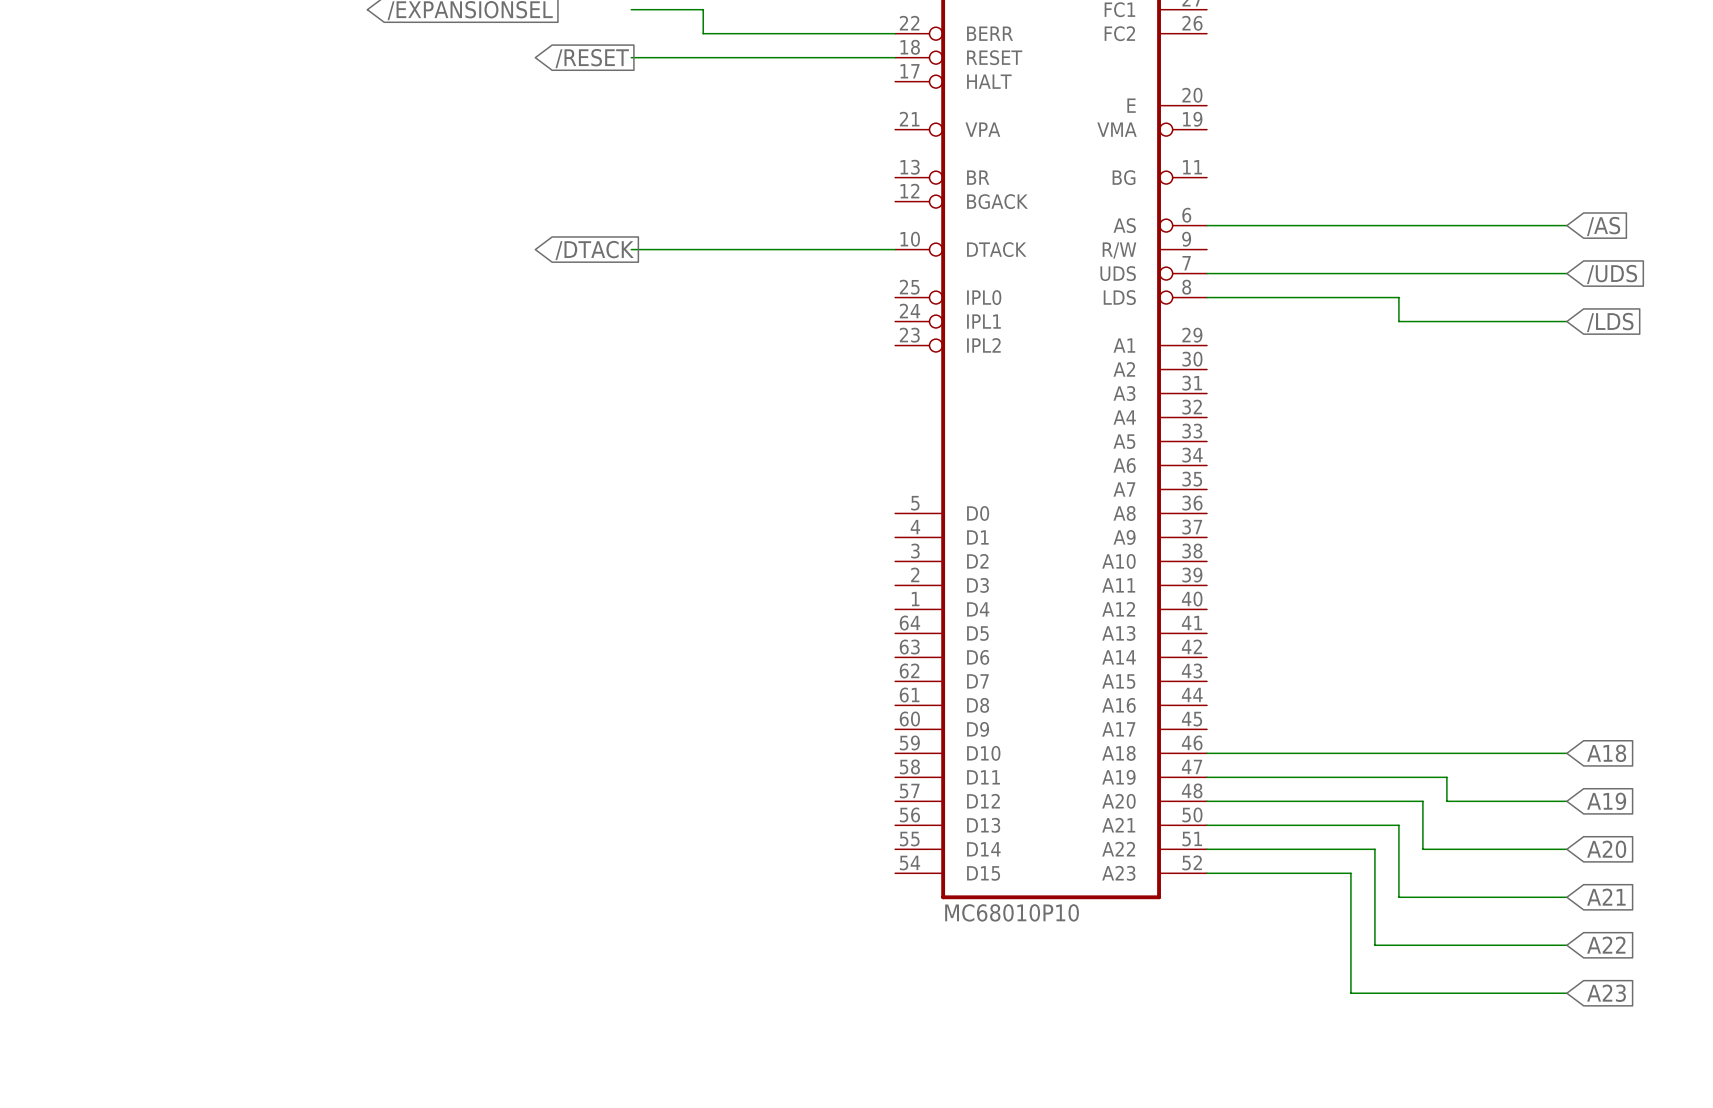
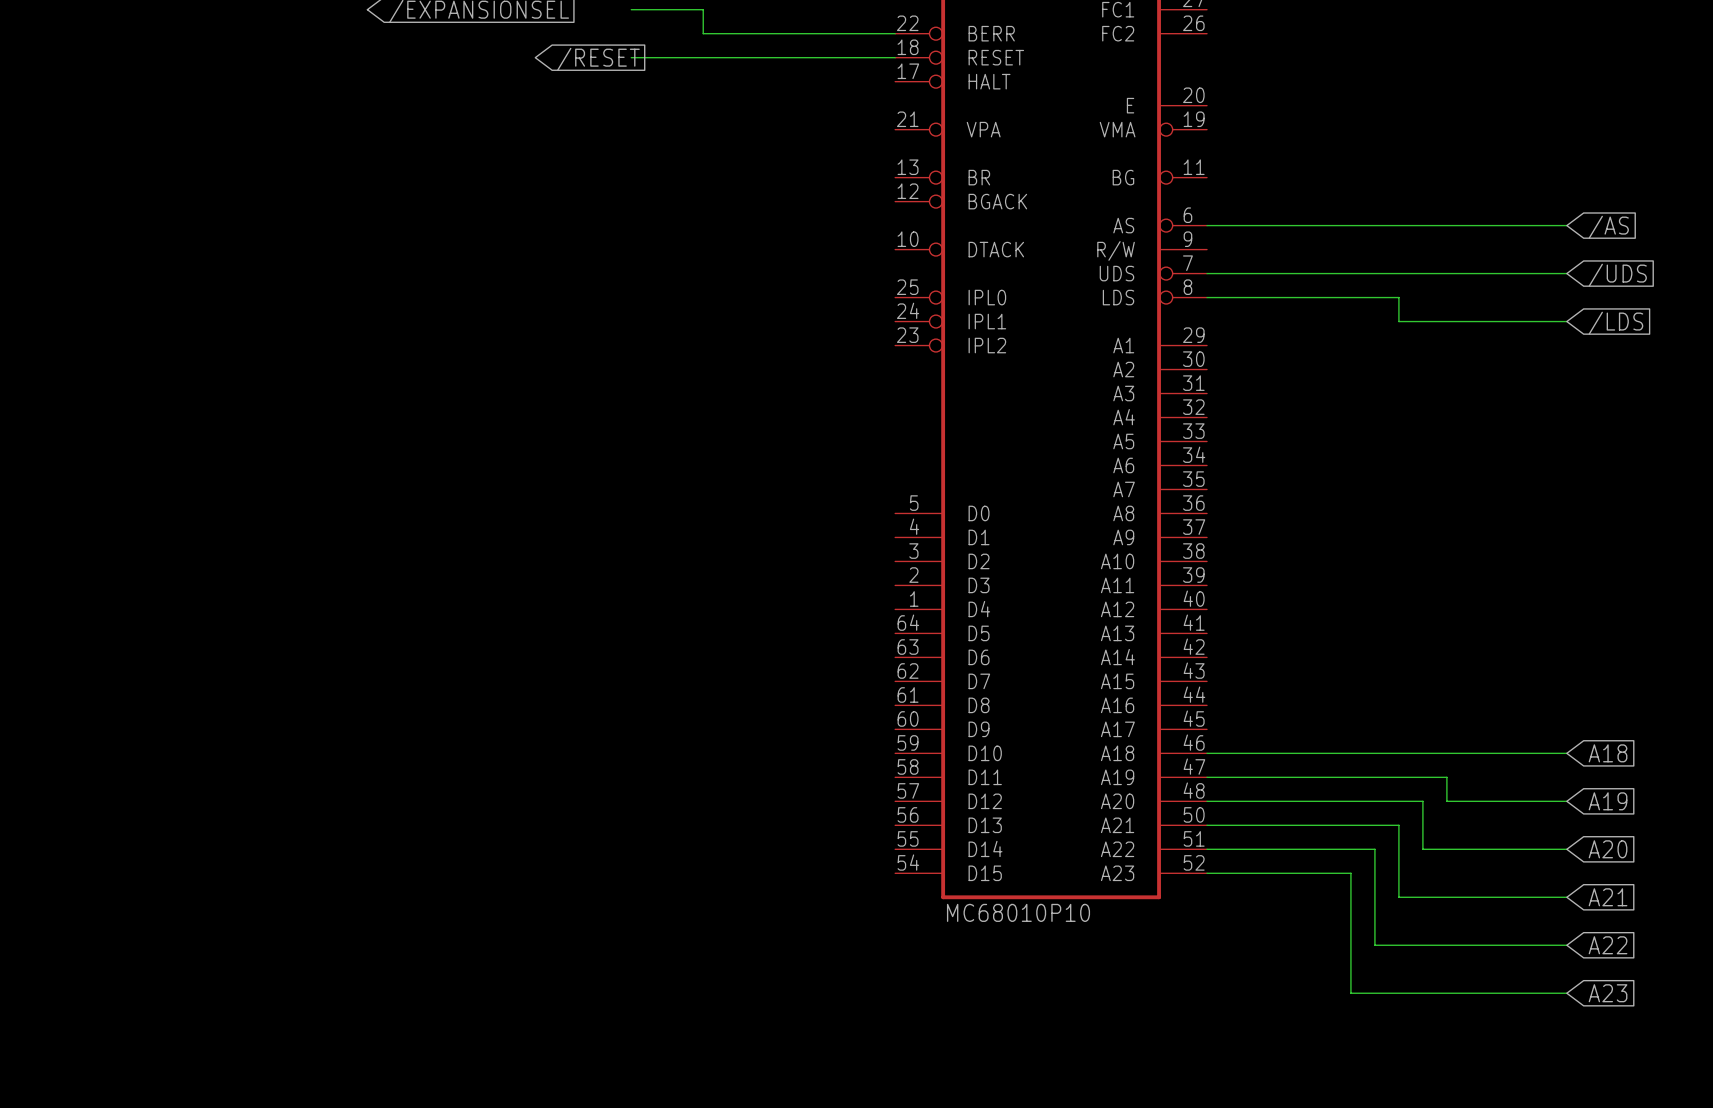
wire: (631, 249) (895, 249) -> none
global label: /DTACK (594, 250) -> none

